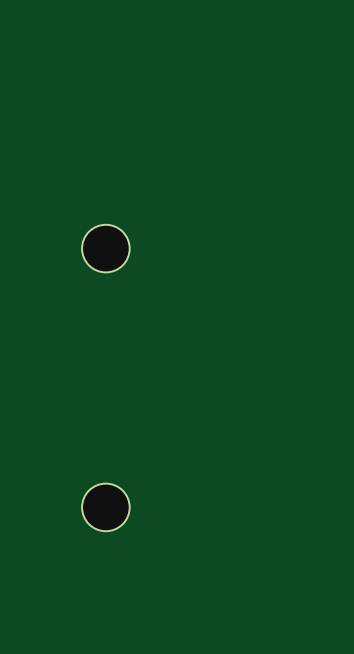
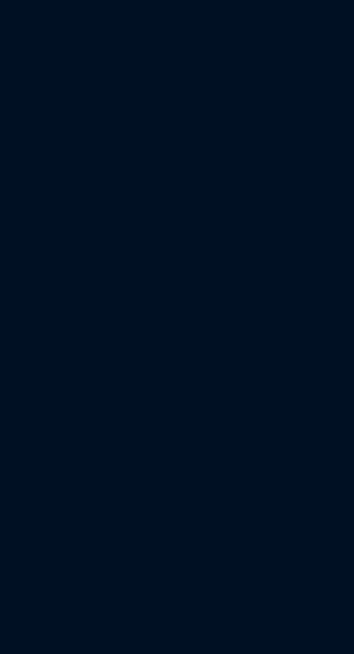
part: (105, 248) -> none
part: (105, 507) -> none

